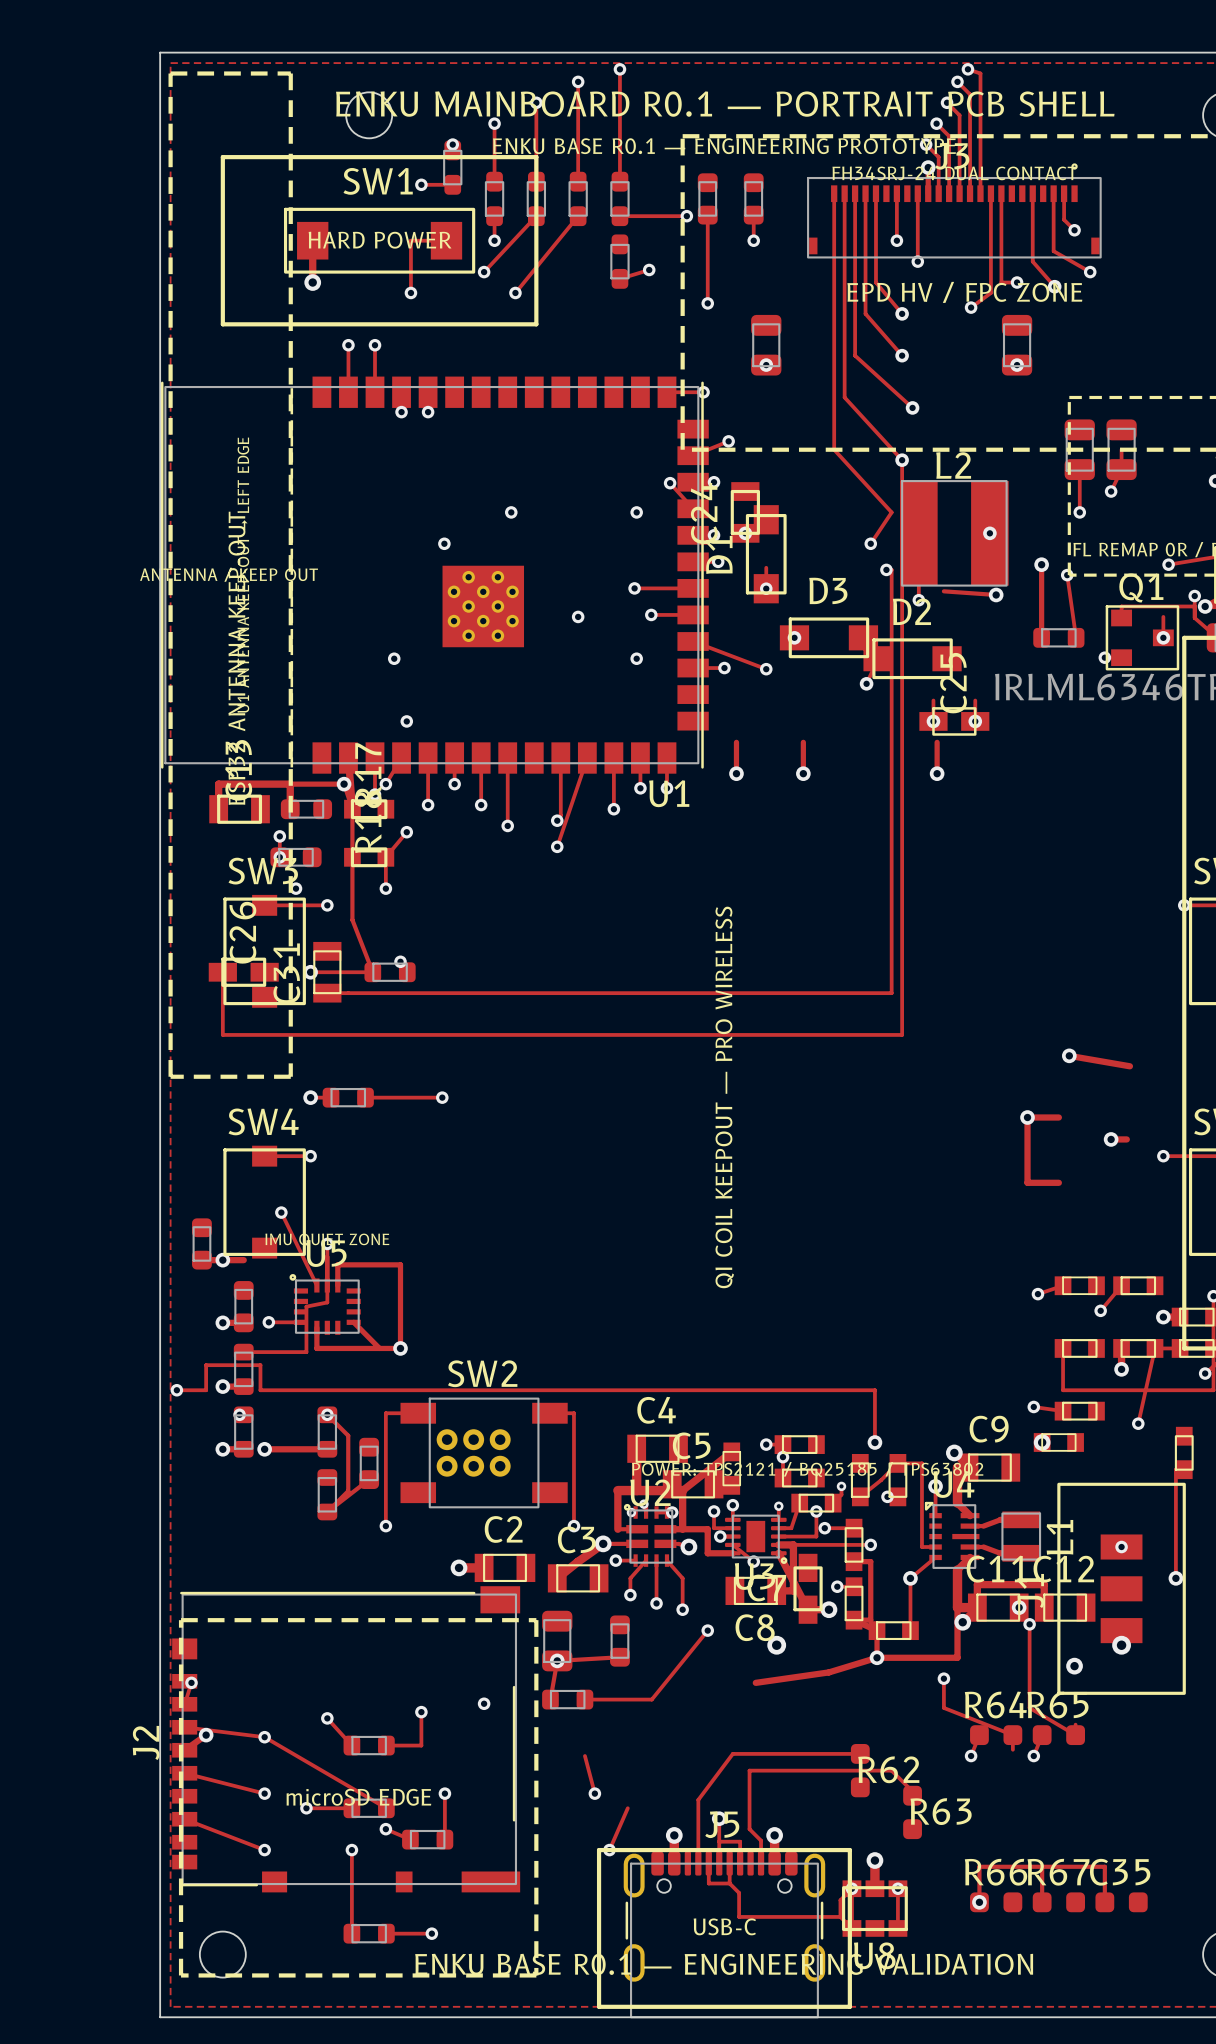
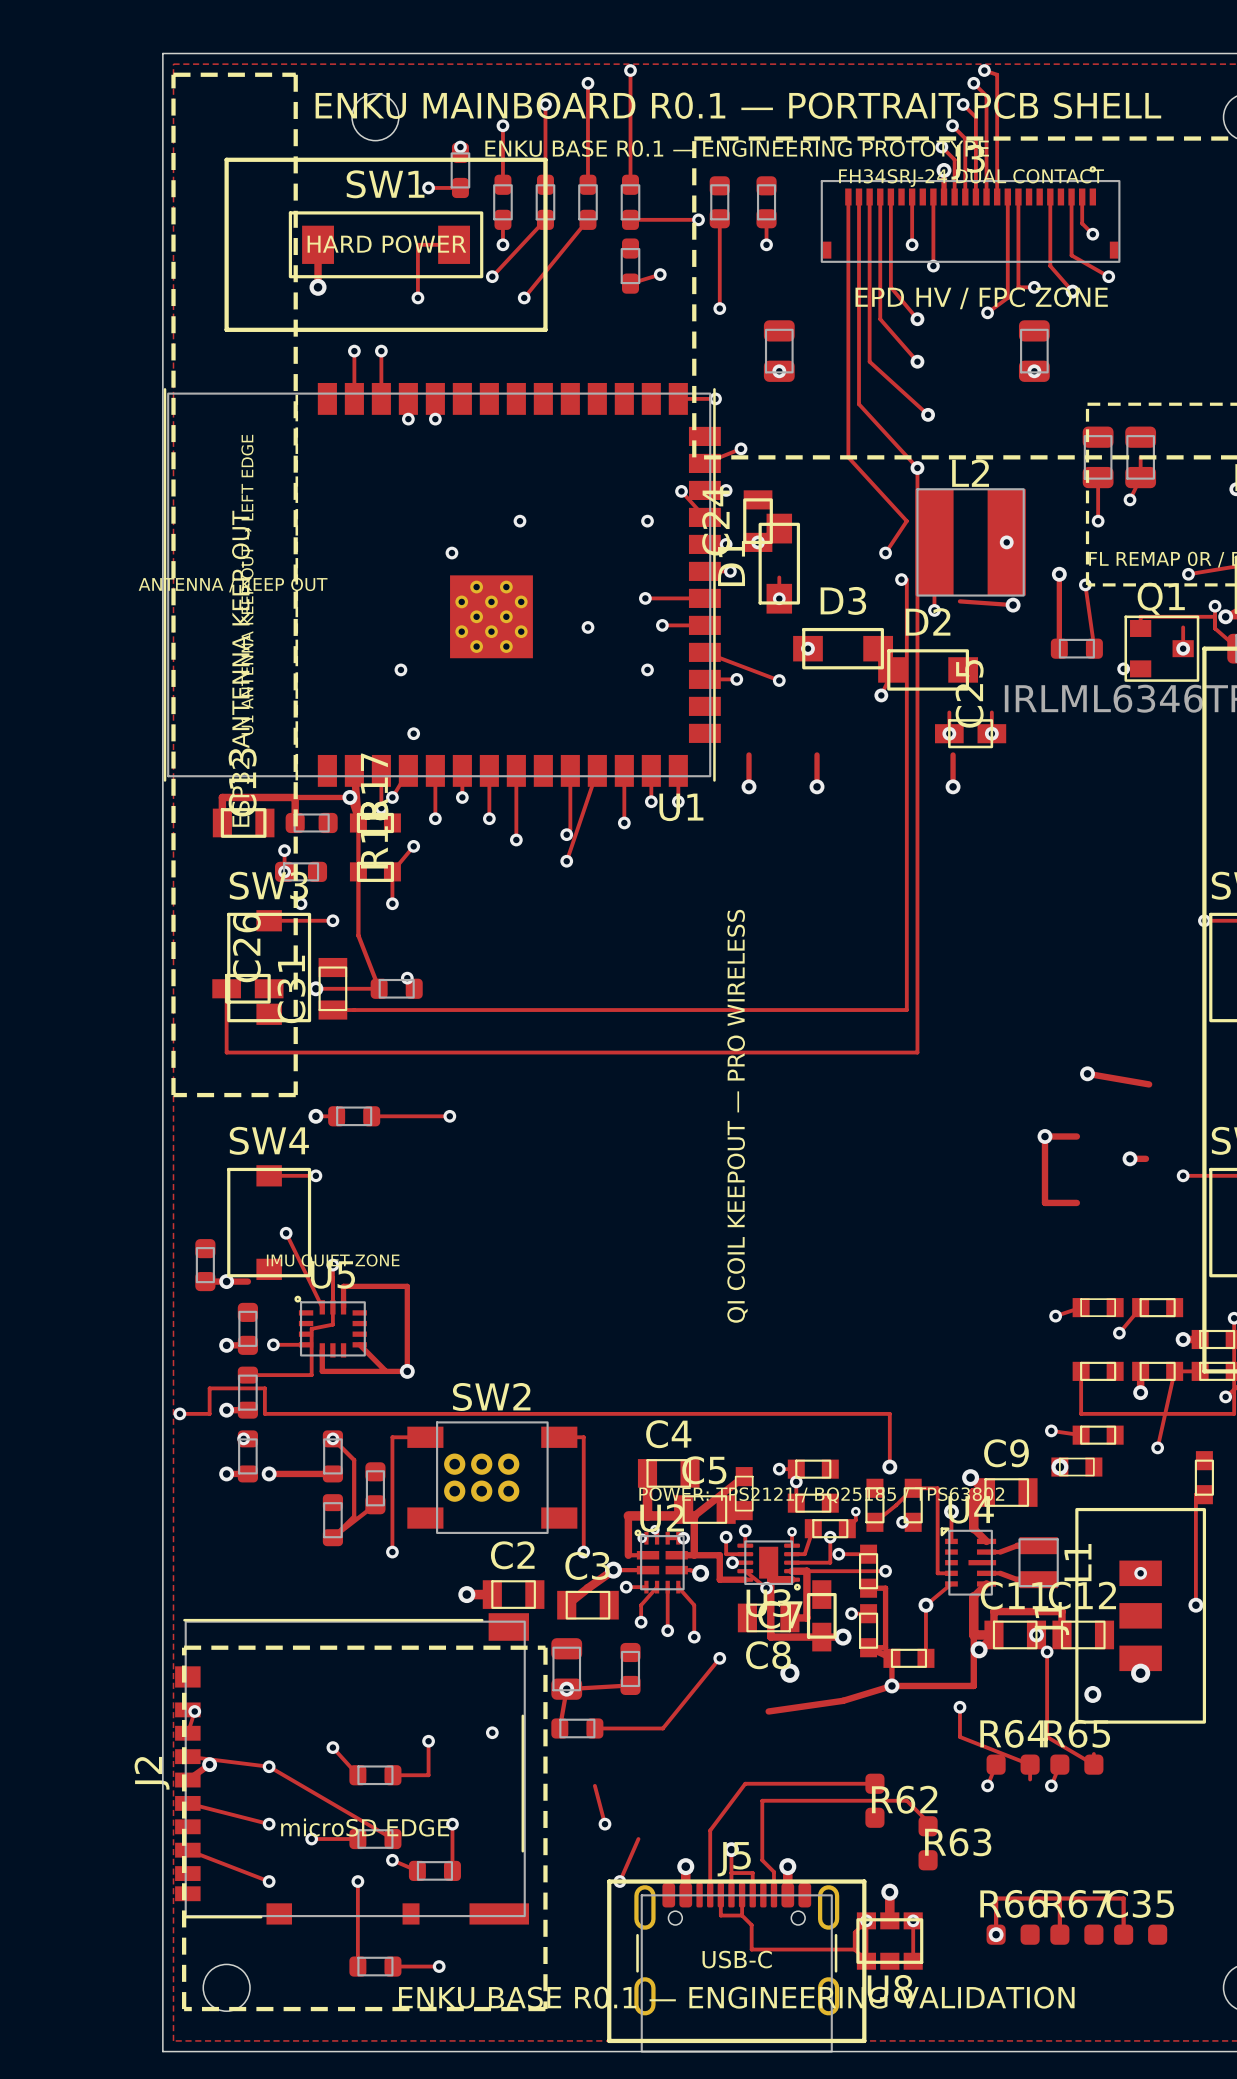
track: (778, 1553) (808, 1609) -> (792, 1579) (770, 1579) (770, 1637) (821, 1637)

